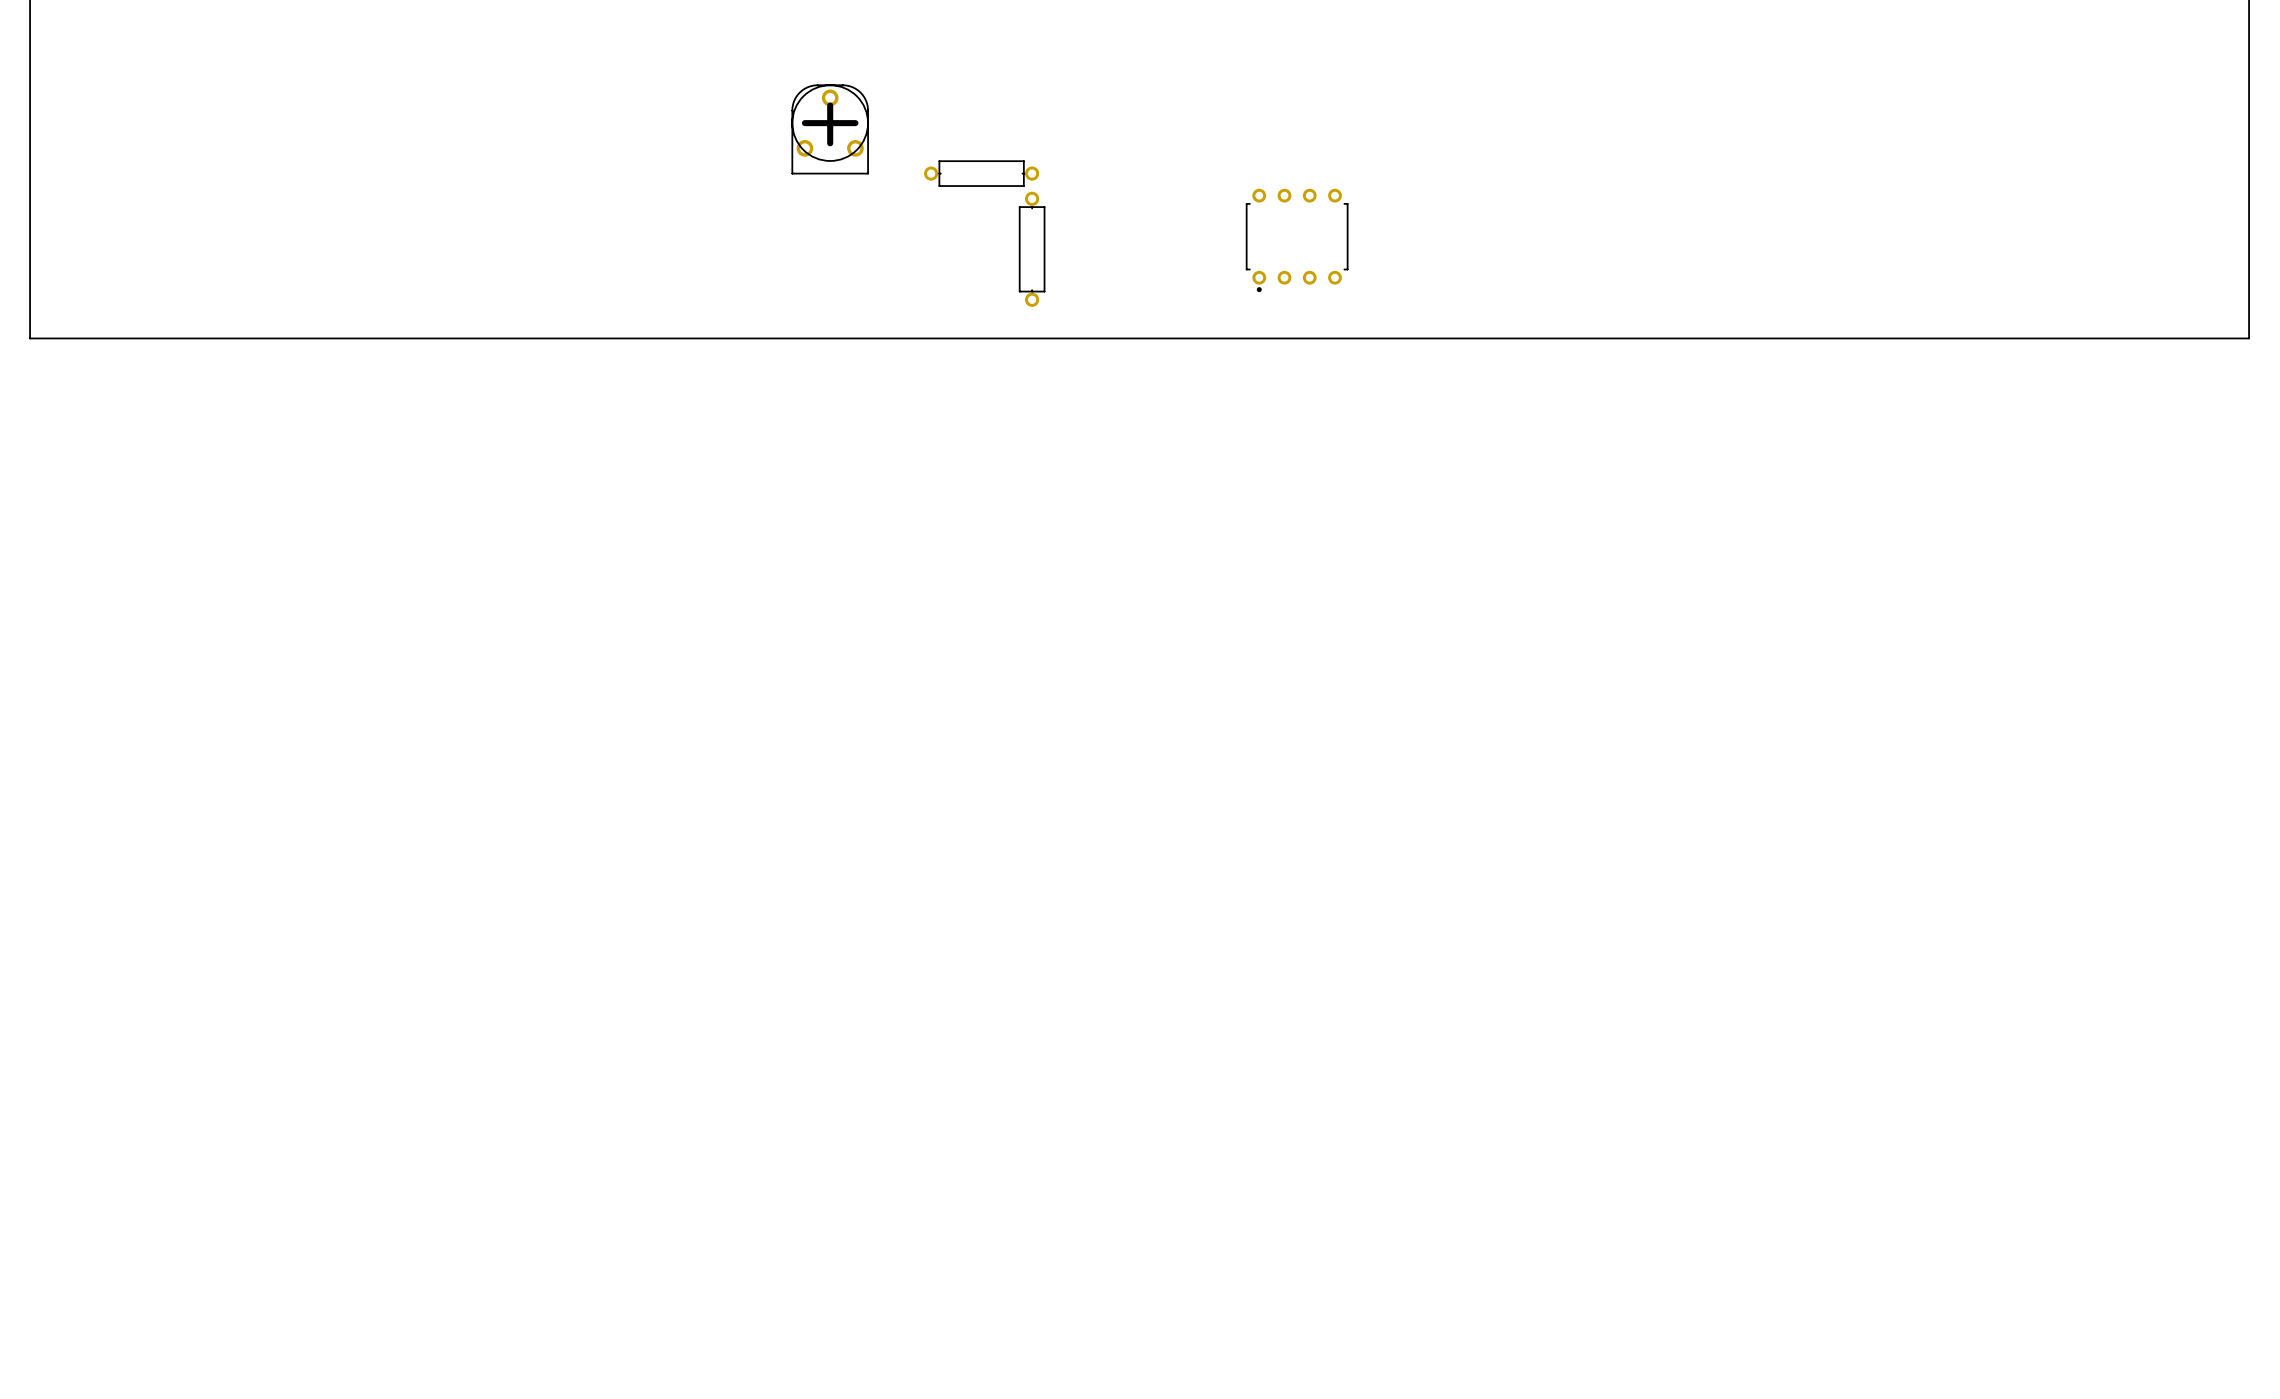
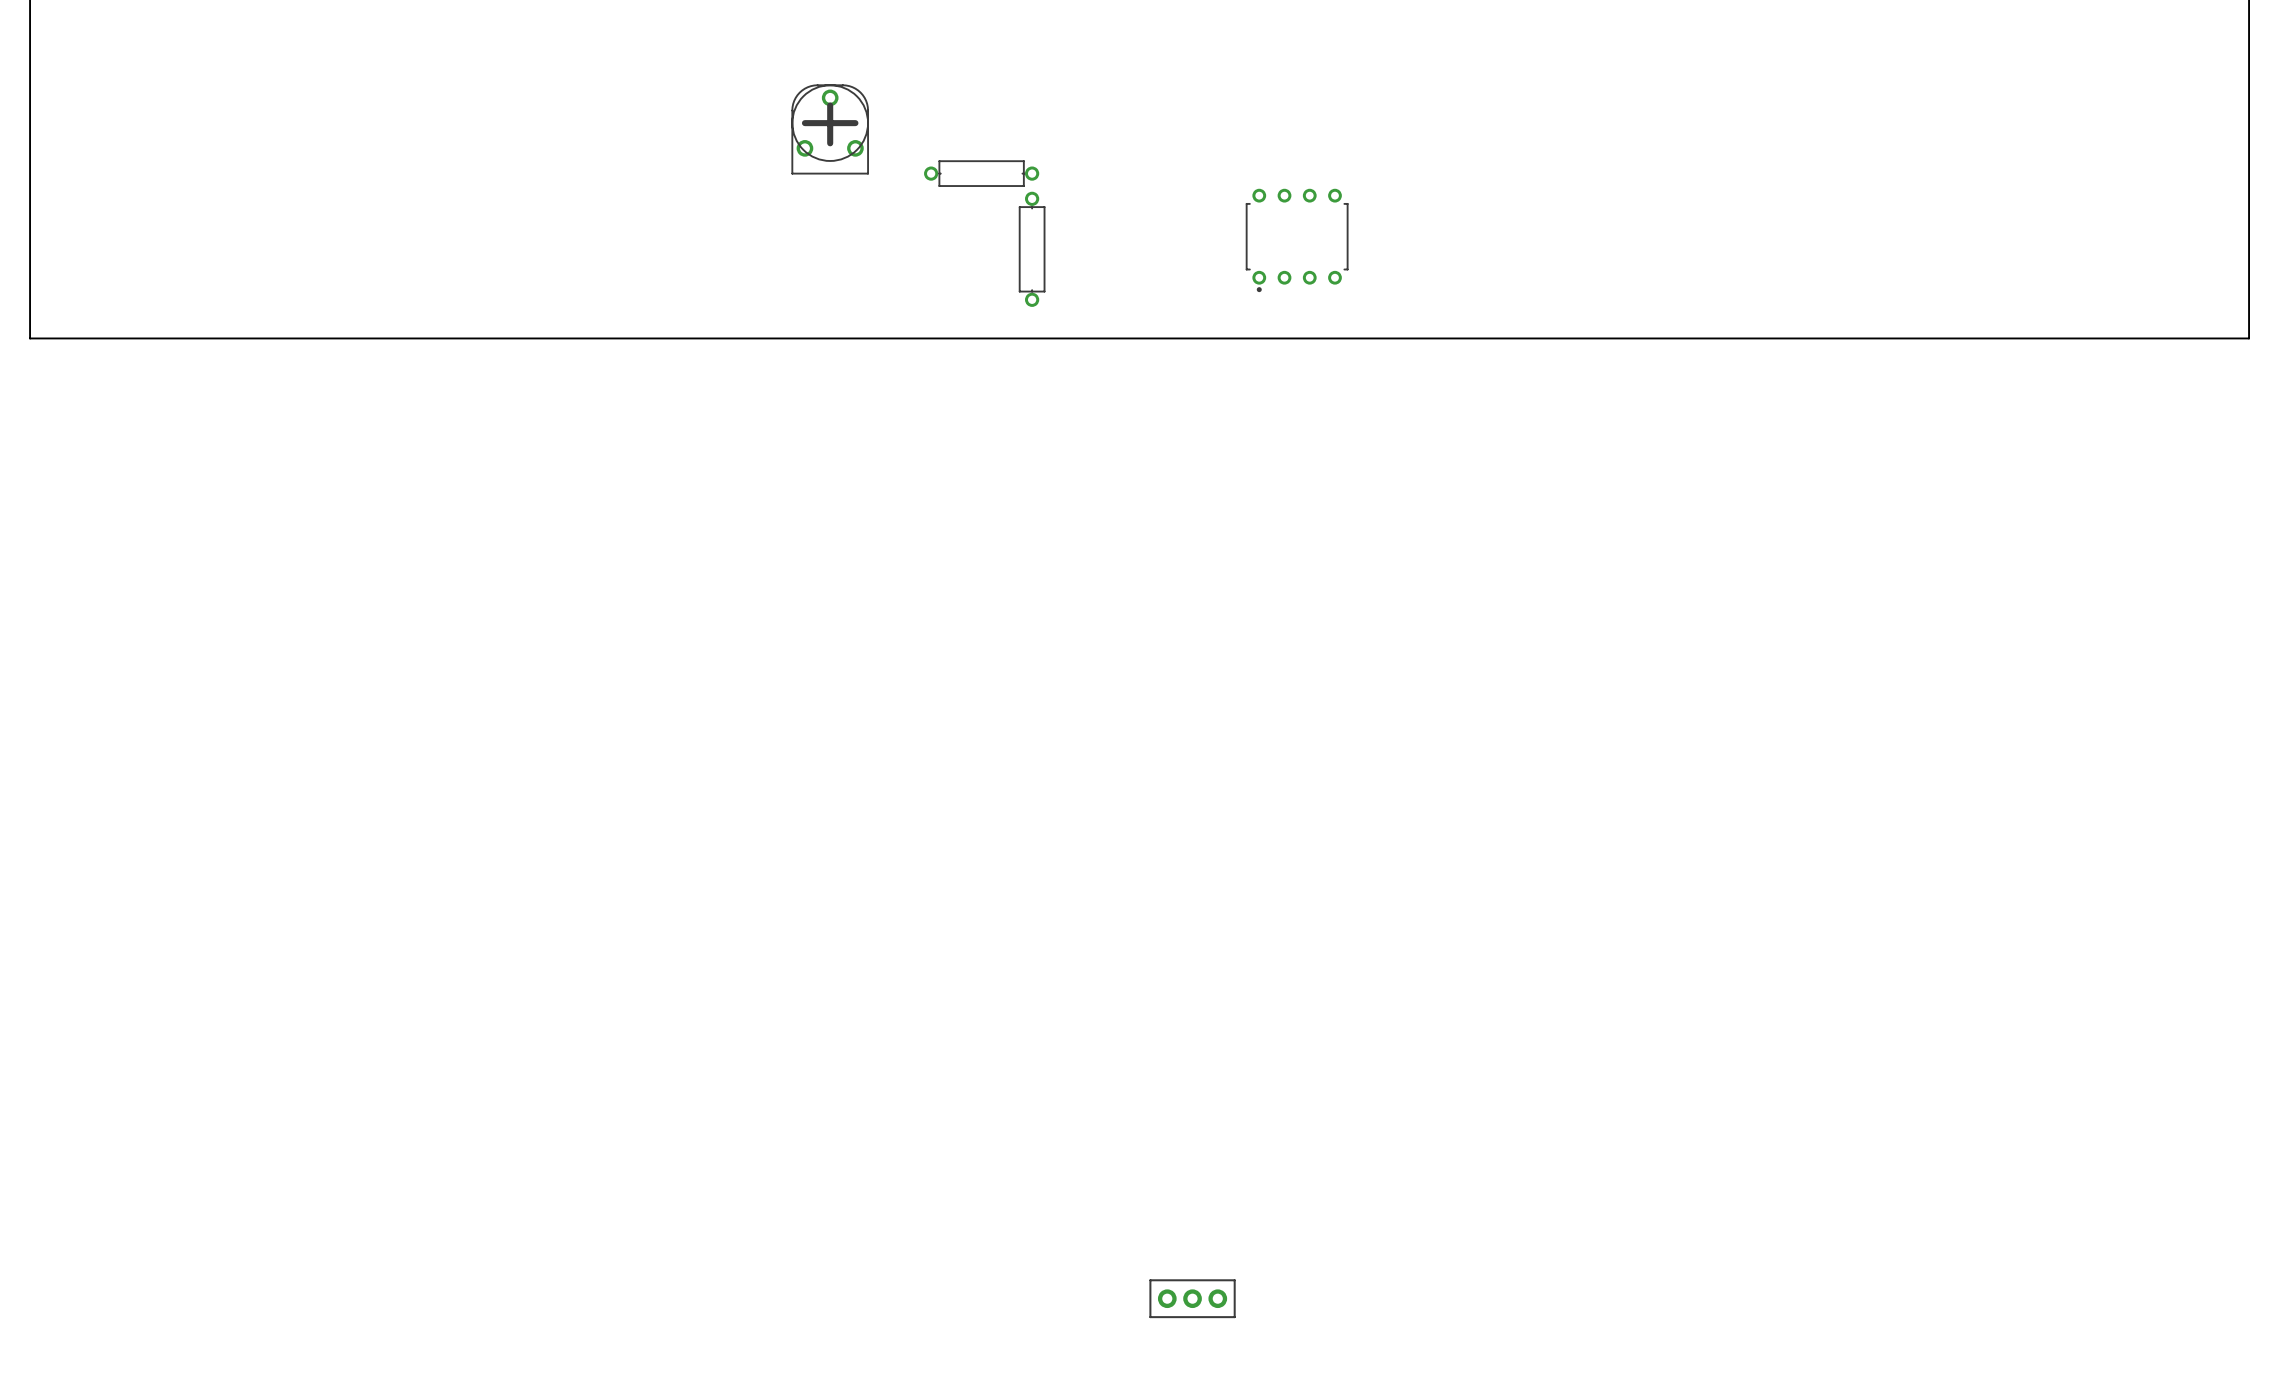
part: none -> (1192, 1298)

